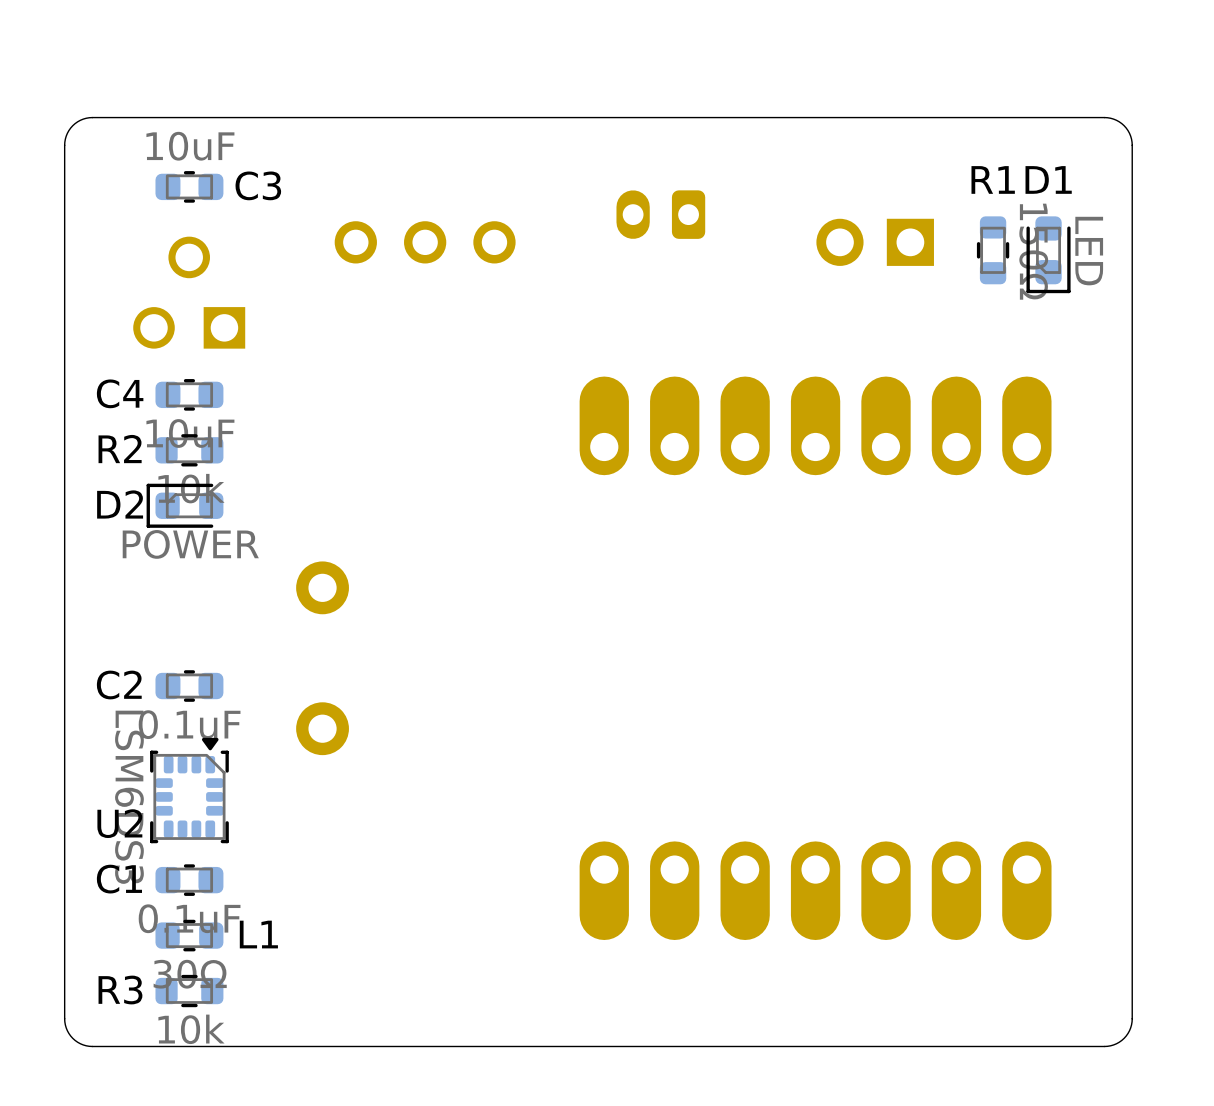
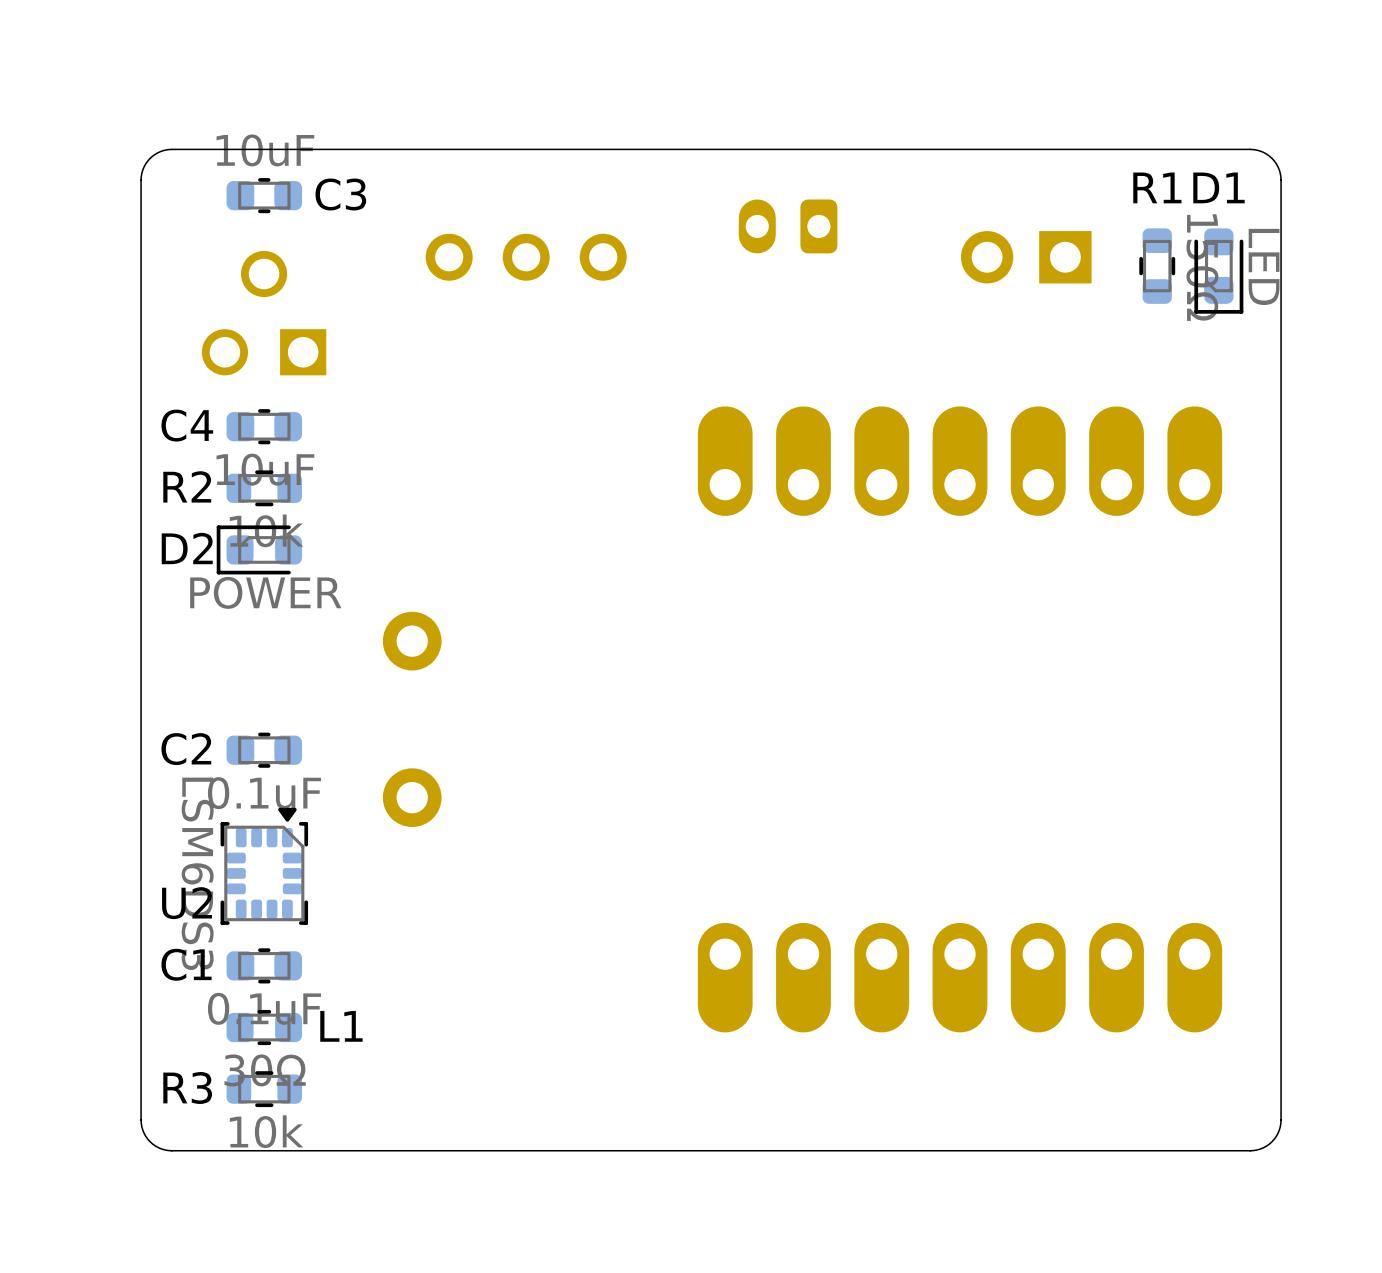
board edge: (1076, 1046) (1107, 1046) (1116, 1043) (1127, 1033) (1132, 1018) (1132, 145) (1130, 136) (1124, 125) (1113, 119) (1104, 117) (92, 117) (80, 120) (72, 125) (66, 136) (64, 145) (64, 1018) (68, 1033) (77, 1042) (89, 1046) (106, 1046) -> (1250, 1150) (1263, 1147) (1272, 1141) (1278, 1133) (1281, 1119) (1281, 180) (1279, 170) (1272, 158) (1260, 151) (1250, 149) (171, 149) (158, 152) (150, 158) (142, 170) (141, 180) (141, 1119) (144, 1133) (150, 1141) (161, 1149) (171, 1150)

